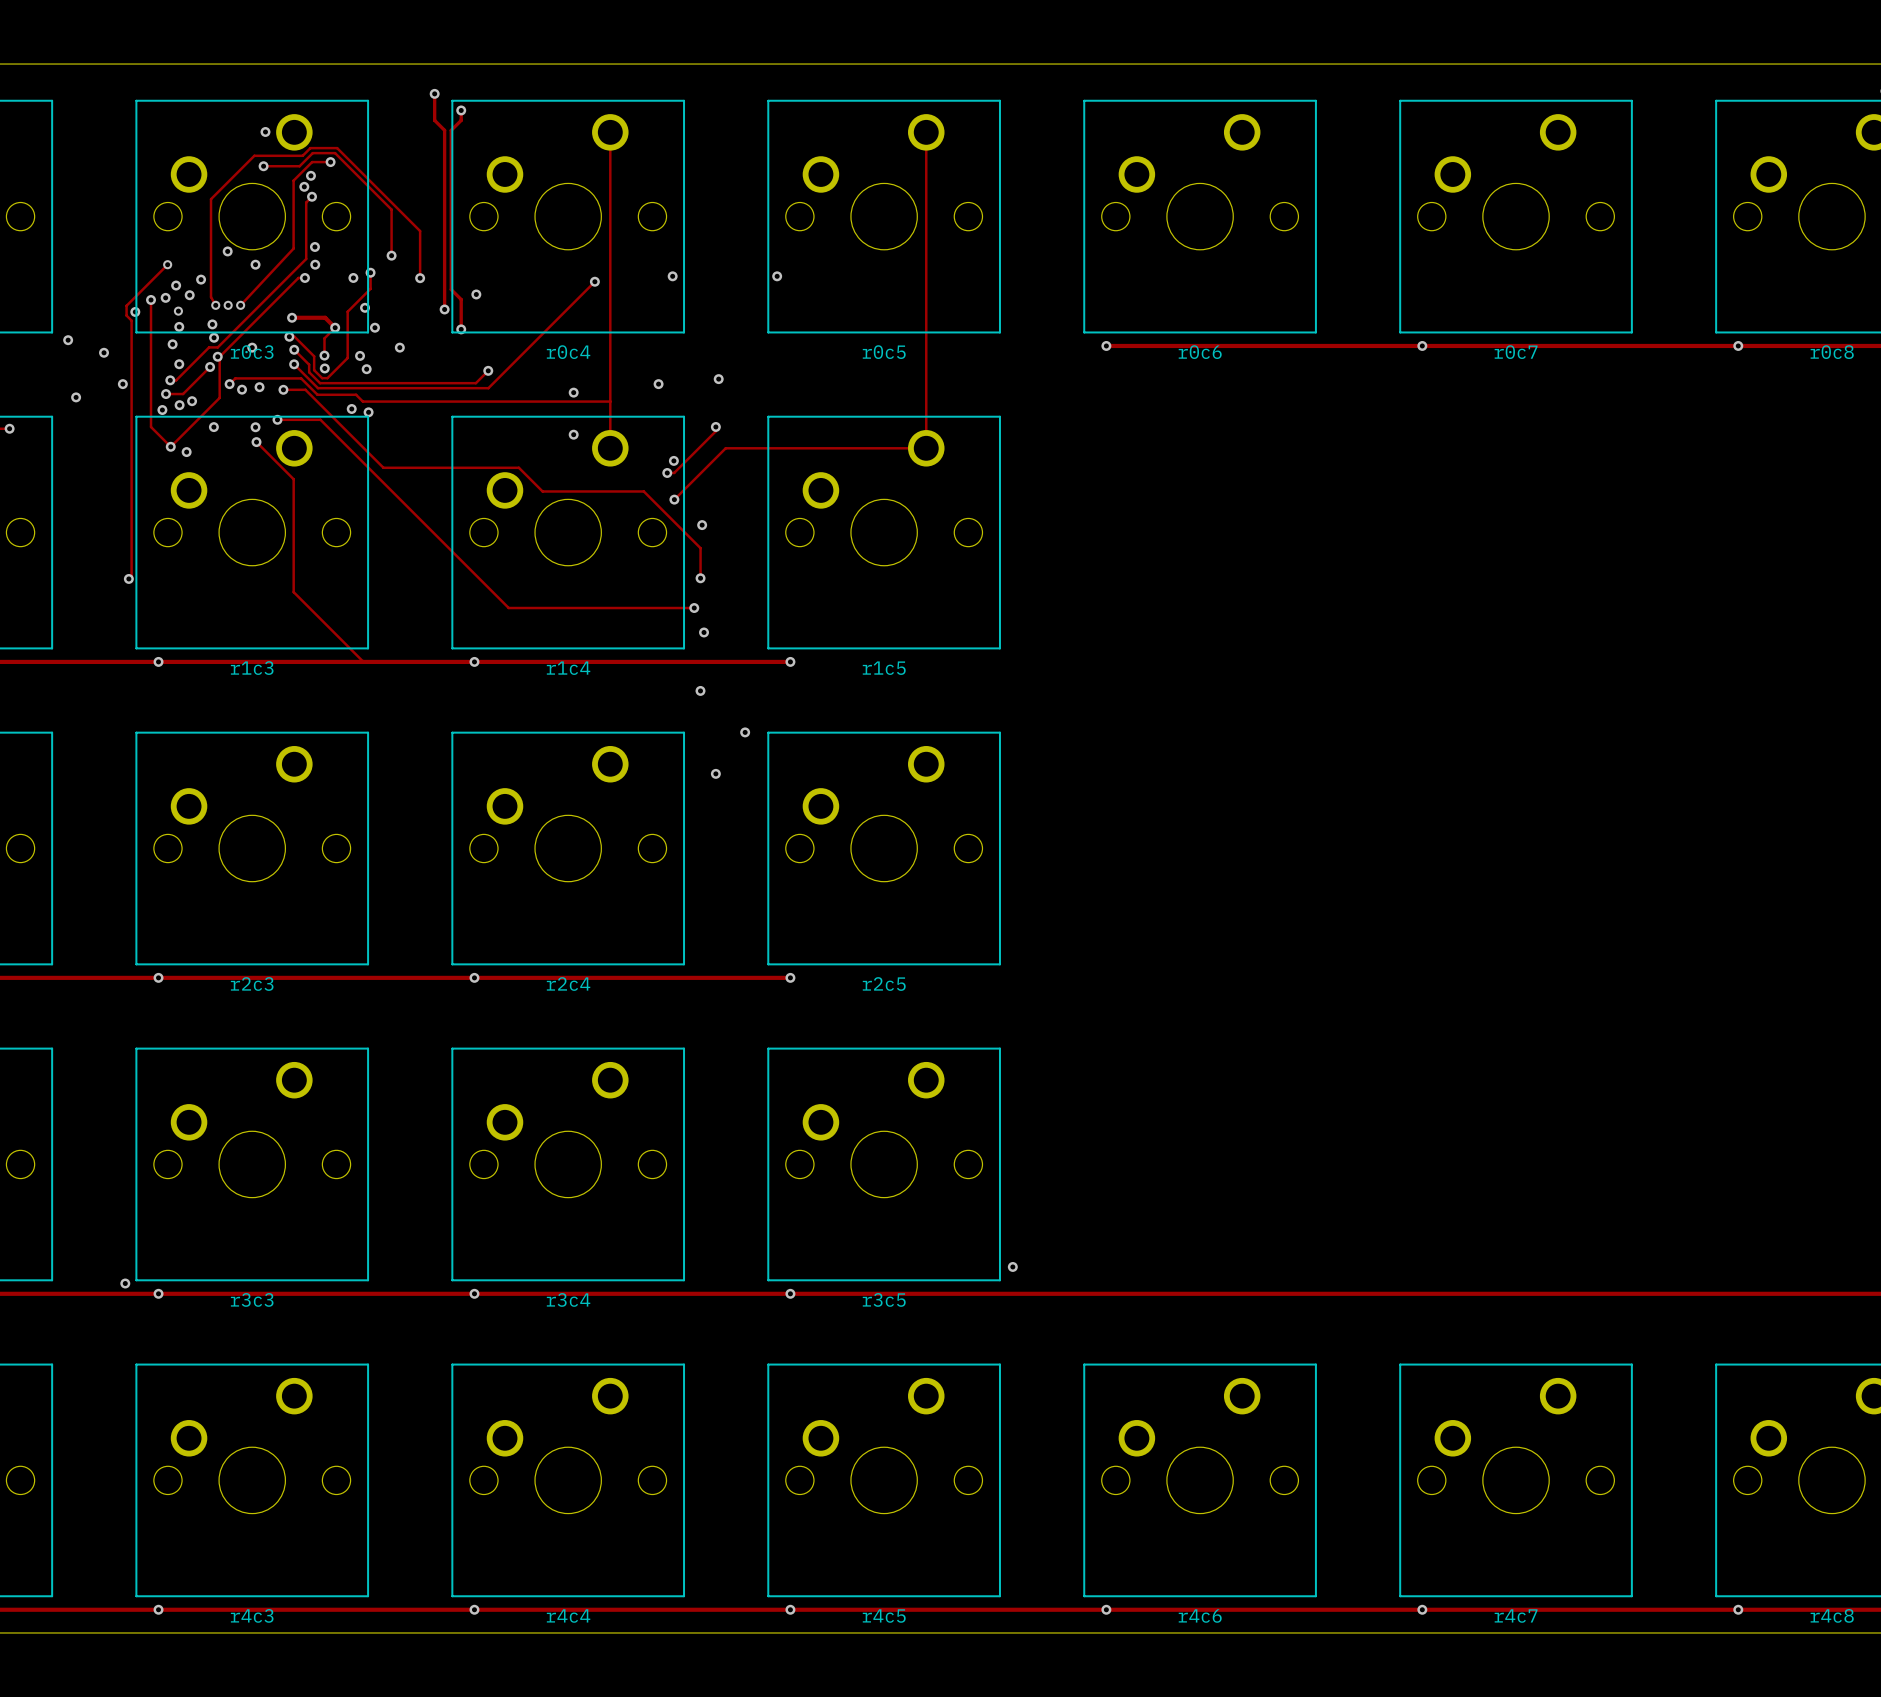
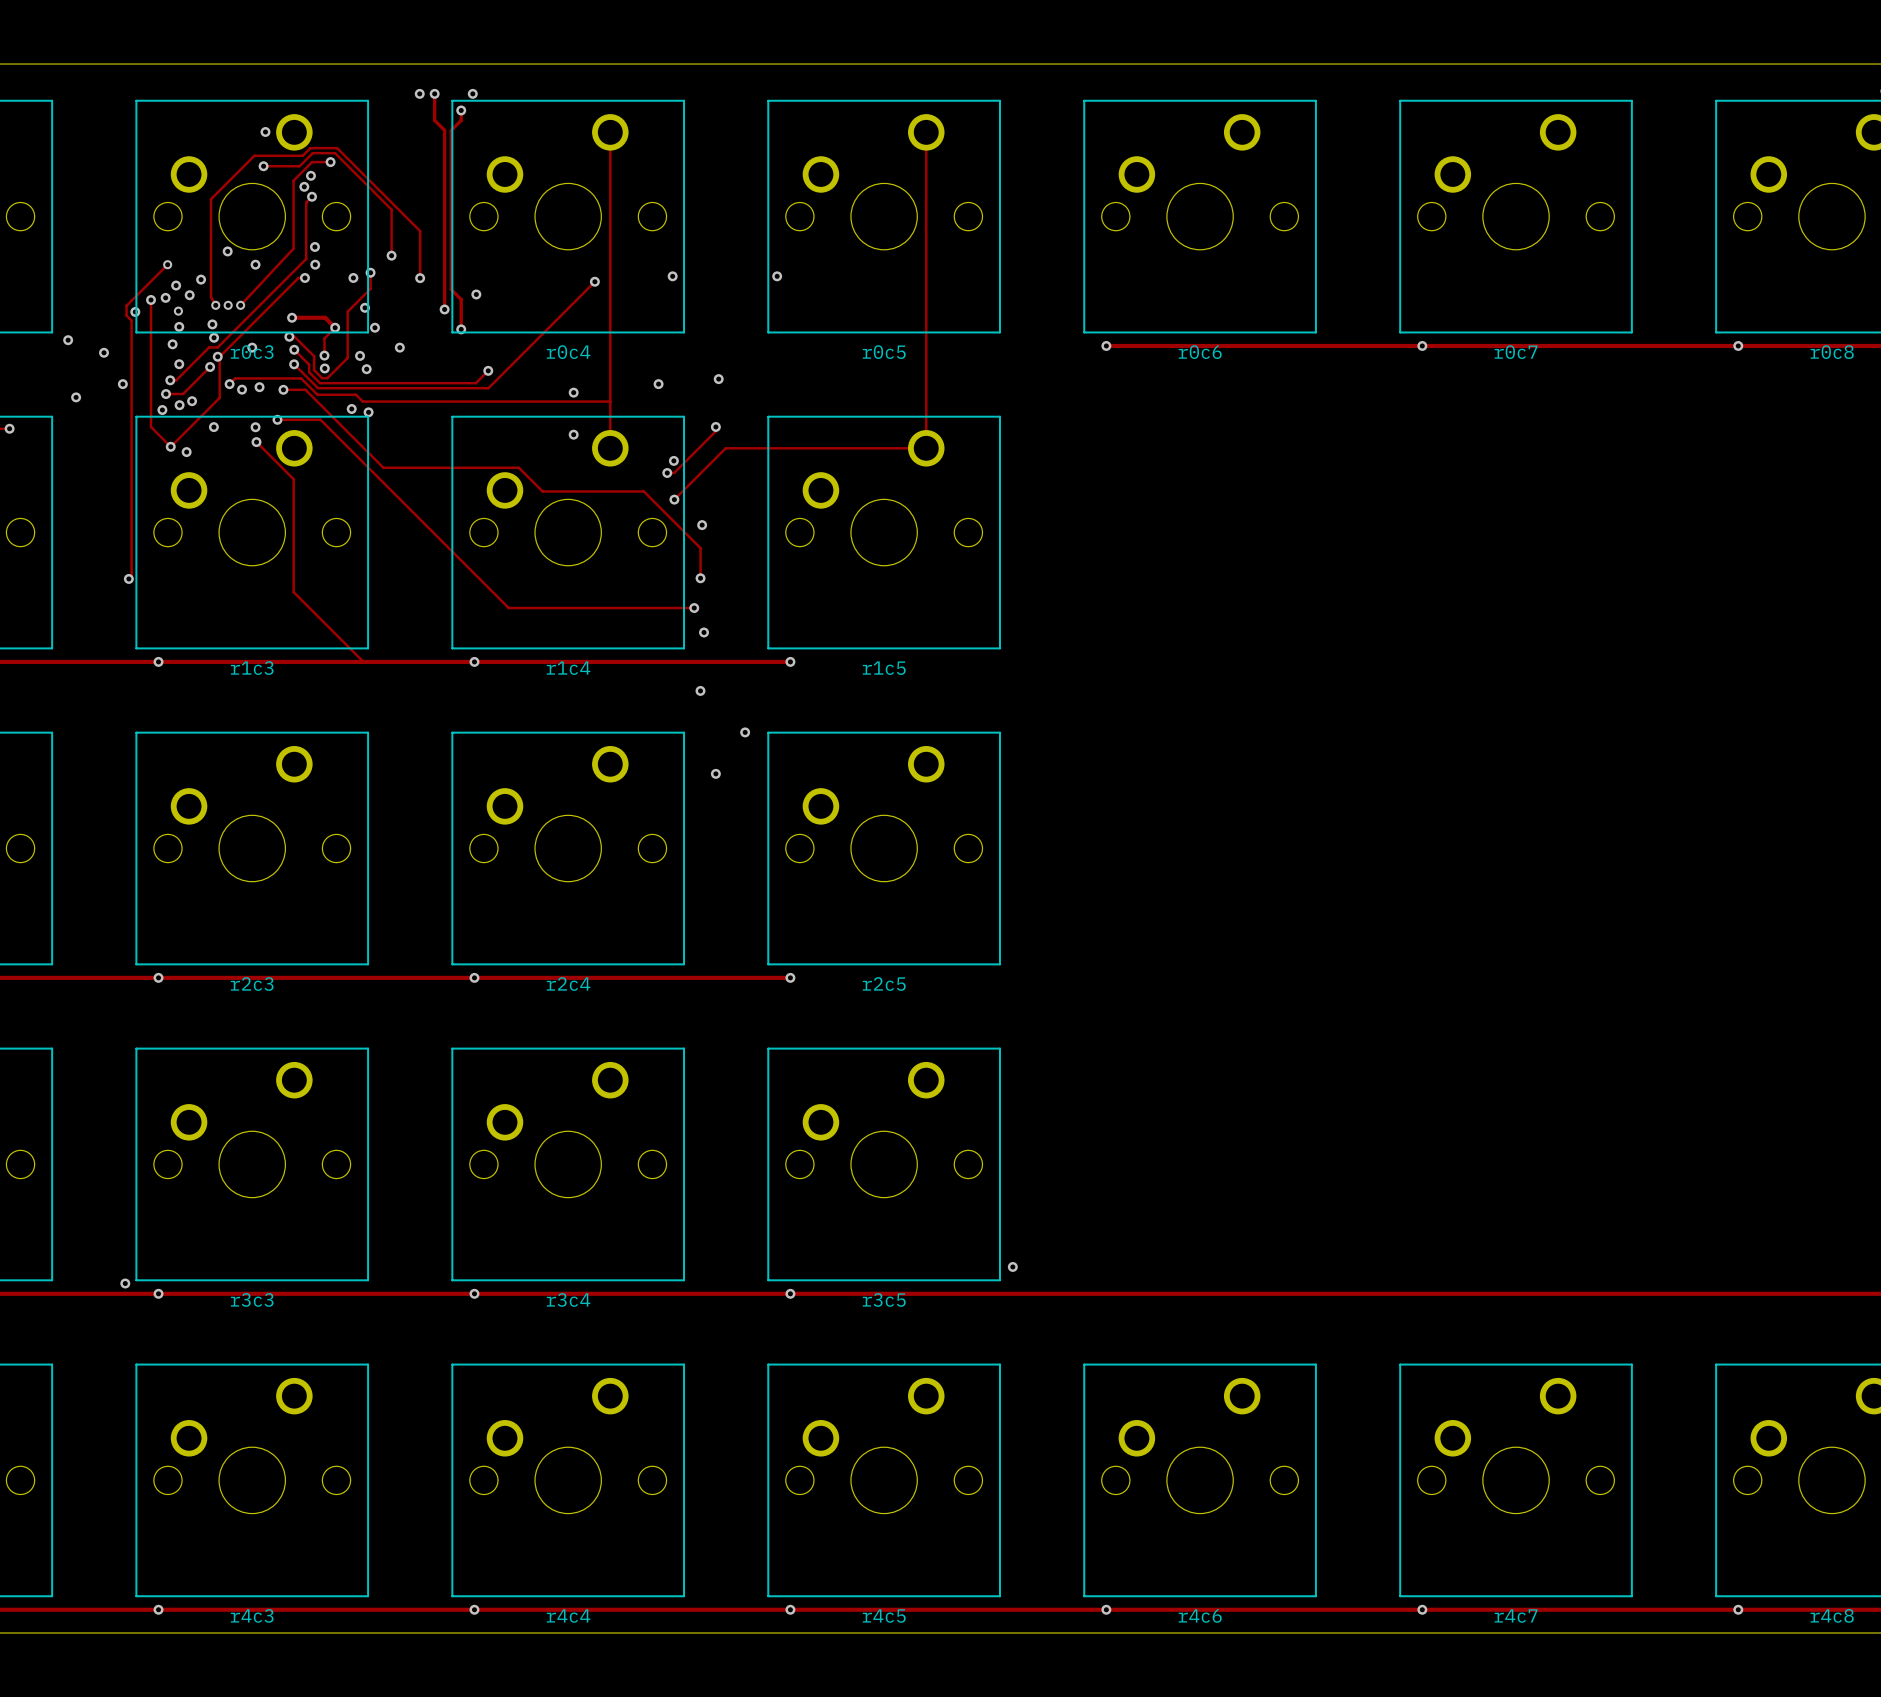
via: none -> (419, 93)
via: none -> (472, 93)

